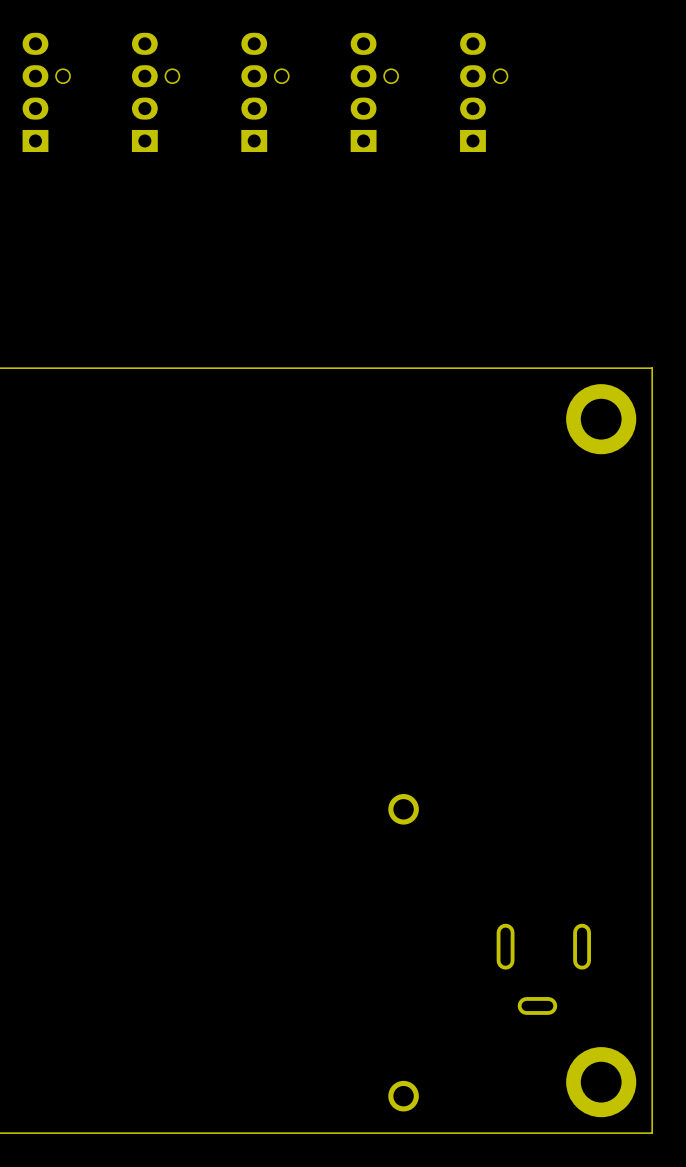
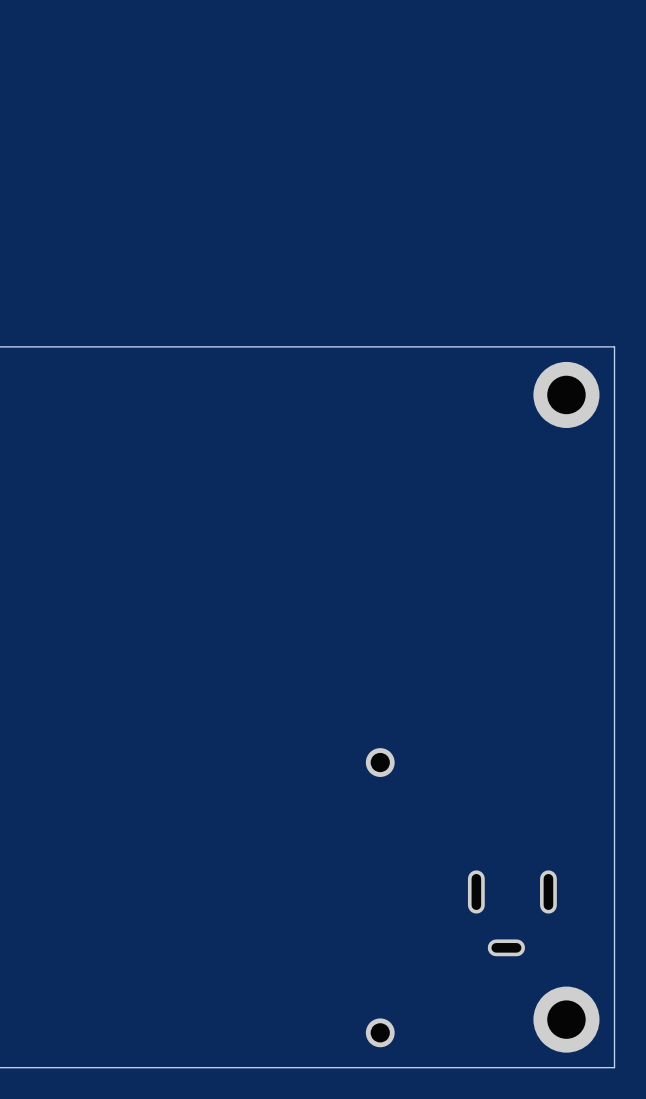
part: (46, 92) -> none
part: (155, 92) -> none
part: (265, 92) -> none
part: (374, 92) -> none
part: (483, 92) -> none

